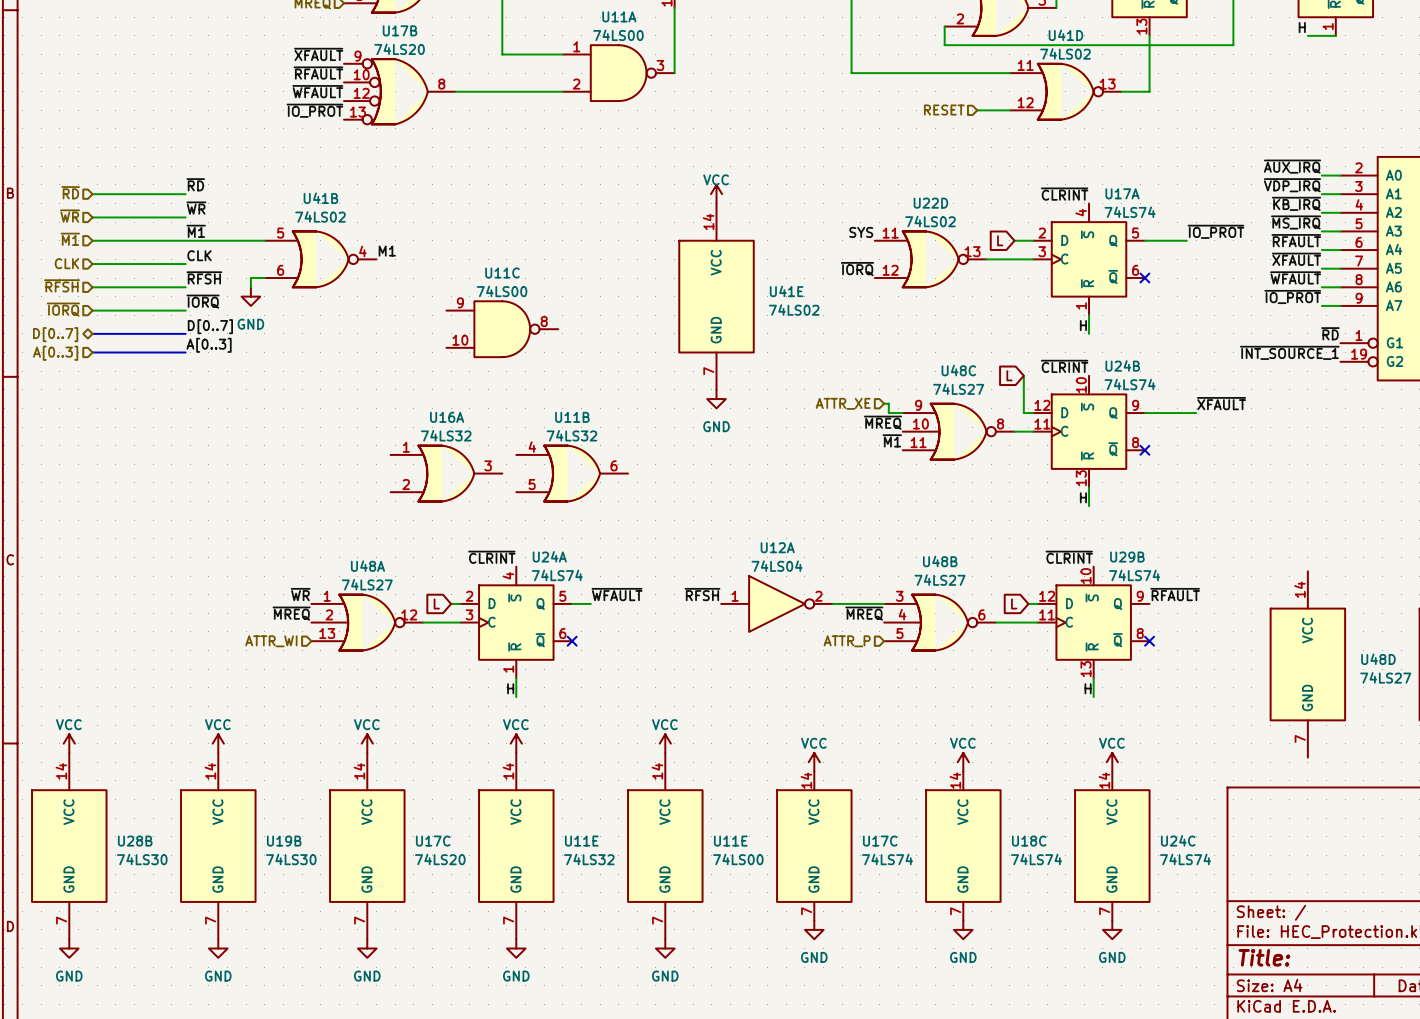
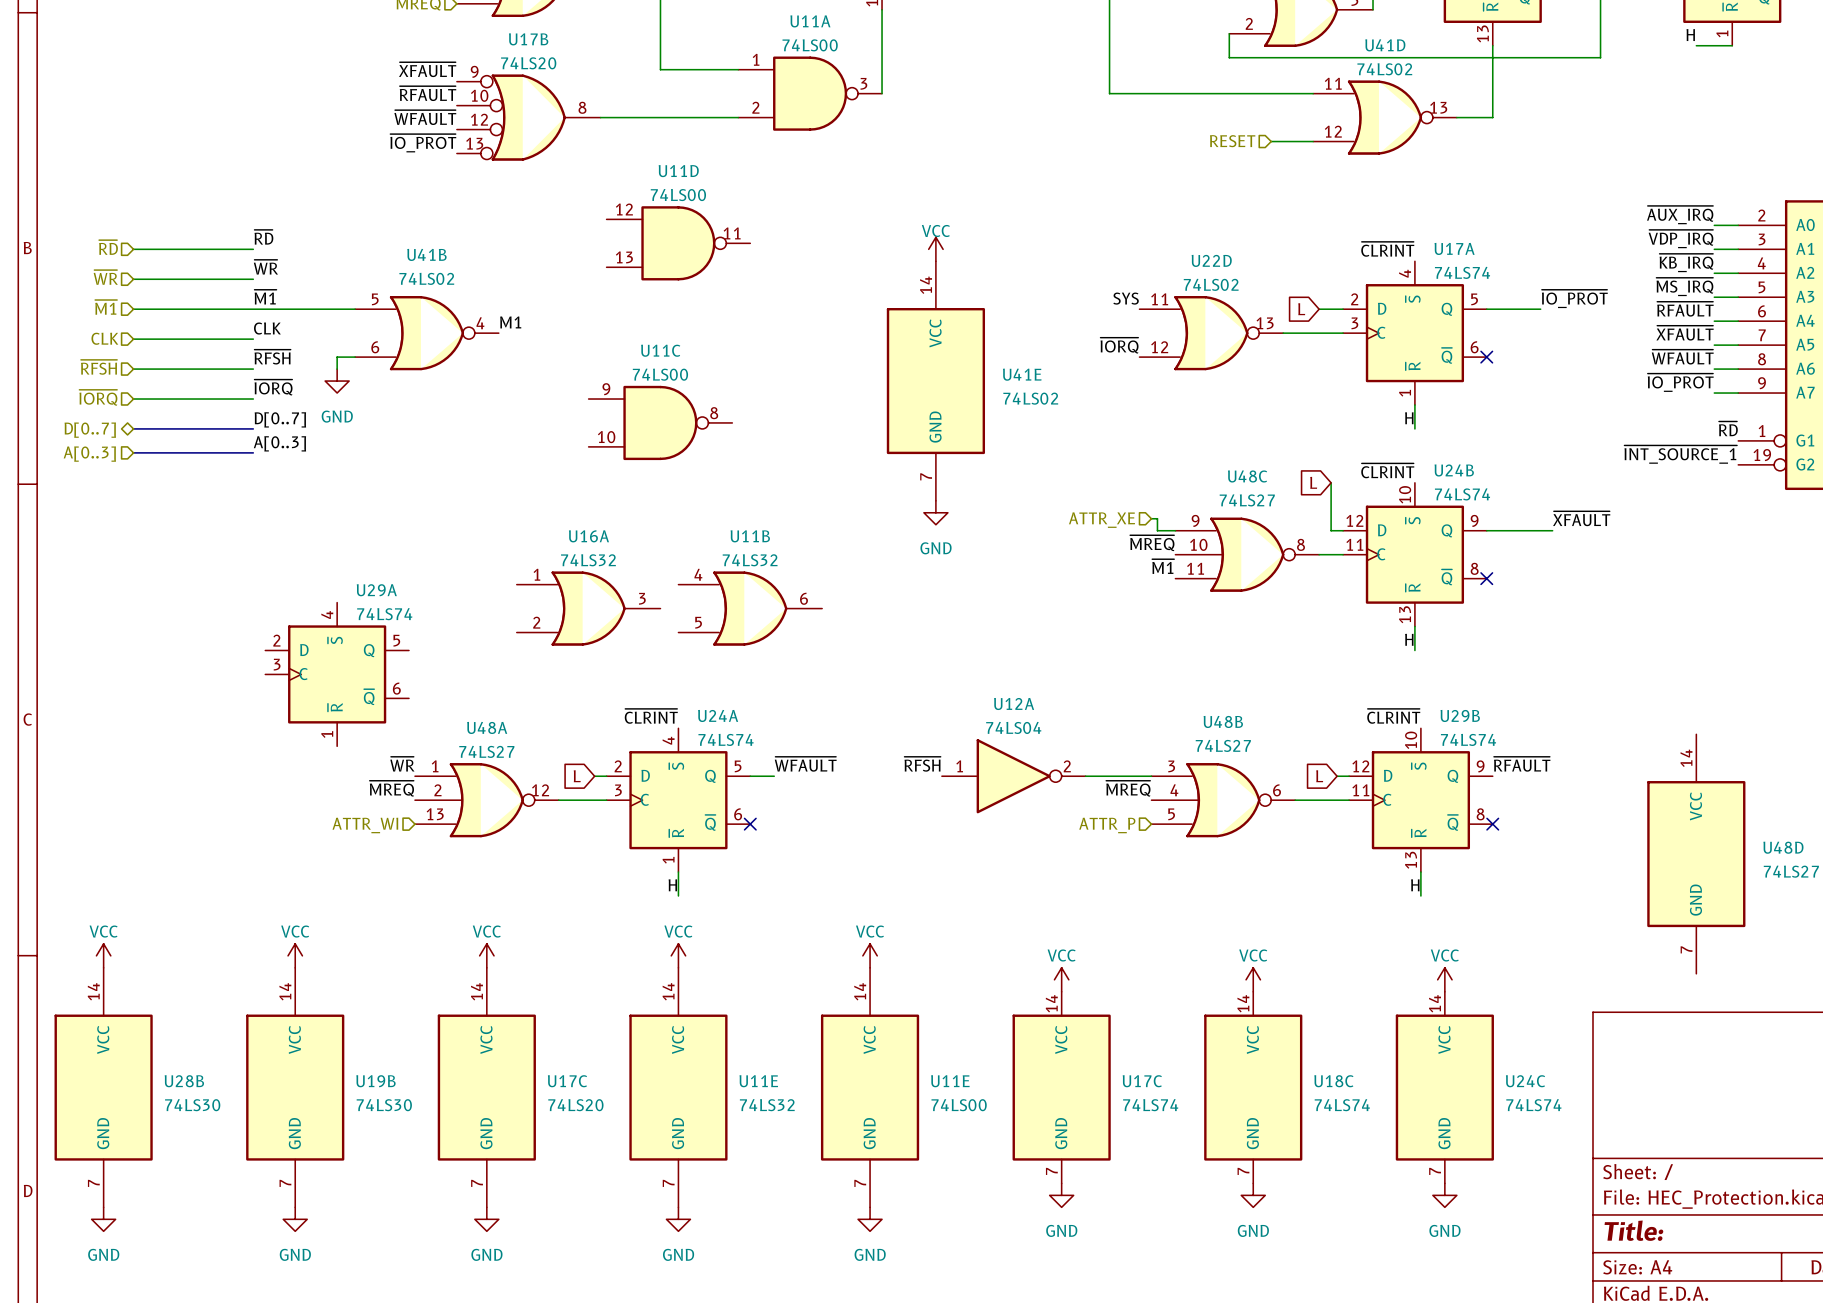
U11D: none -> 74LS00 (678, 243)
U29A: none -> 74LS74 (337, 674)

